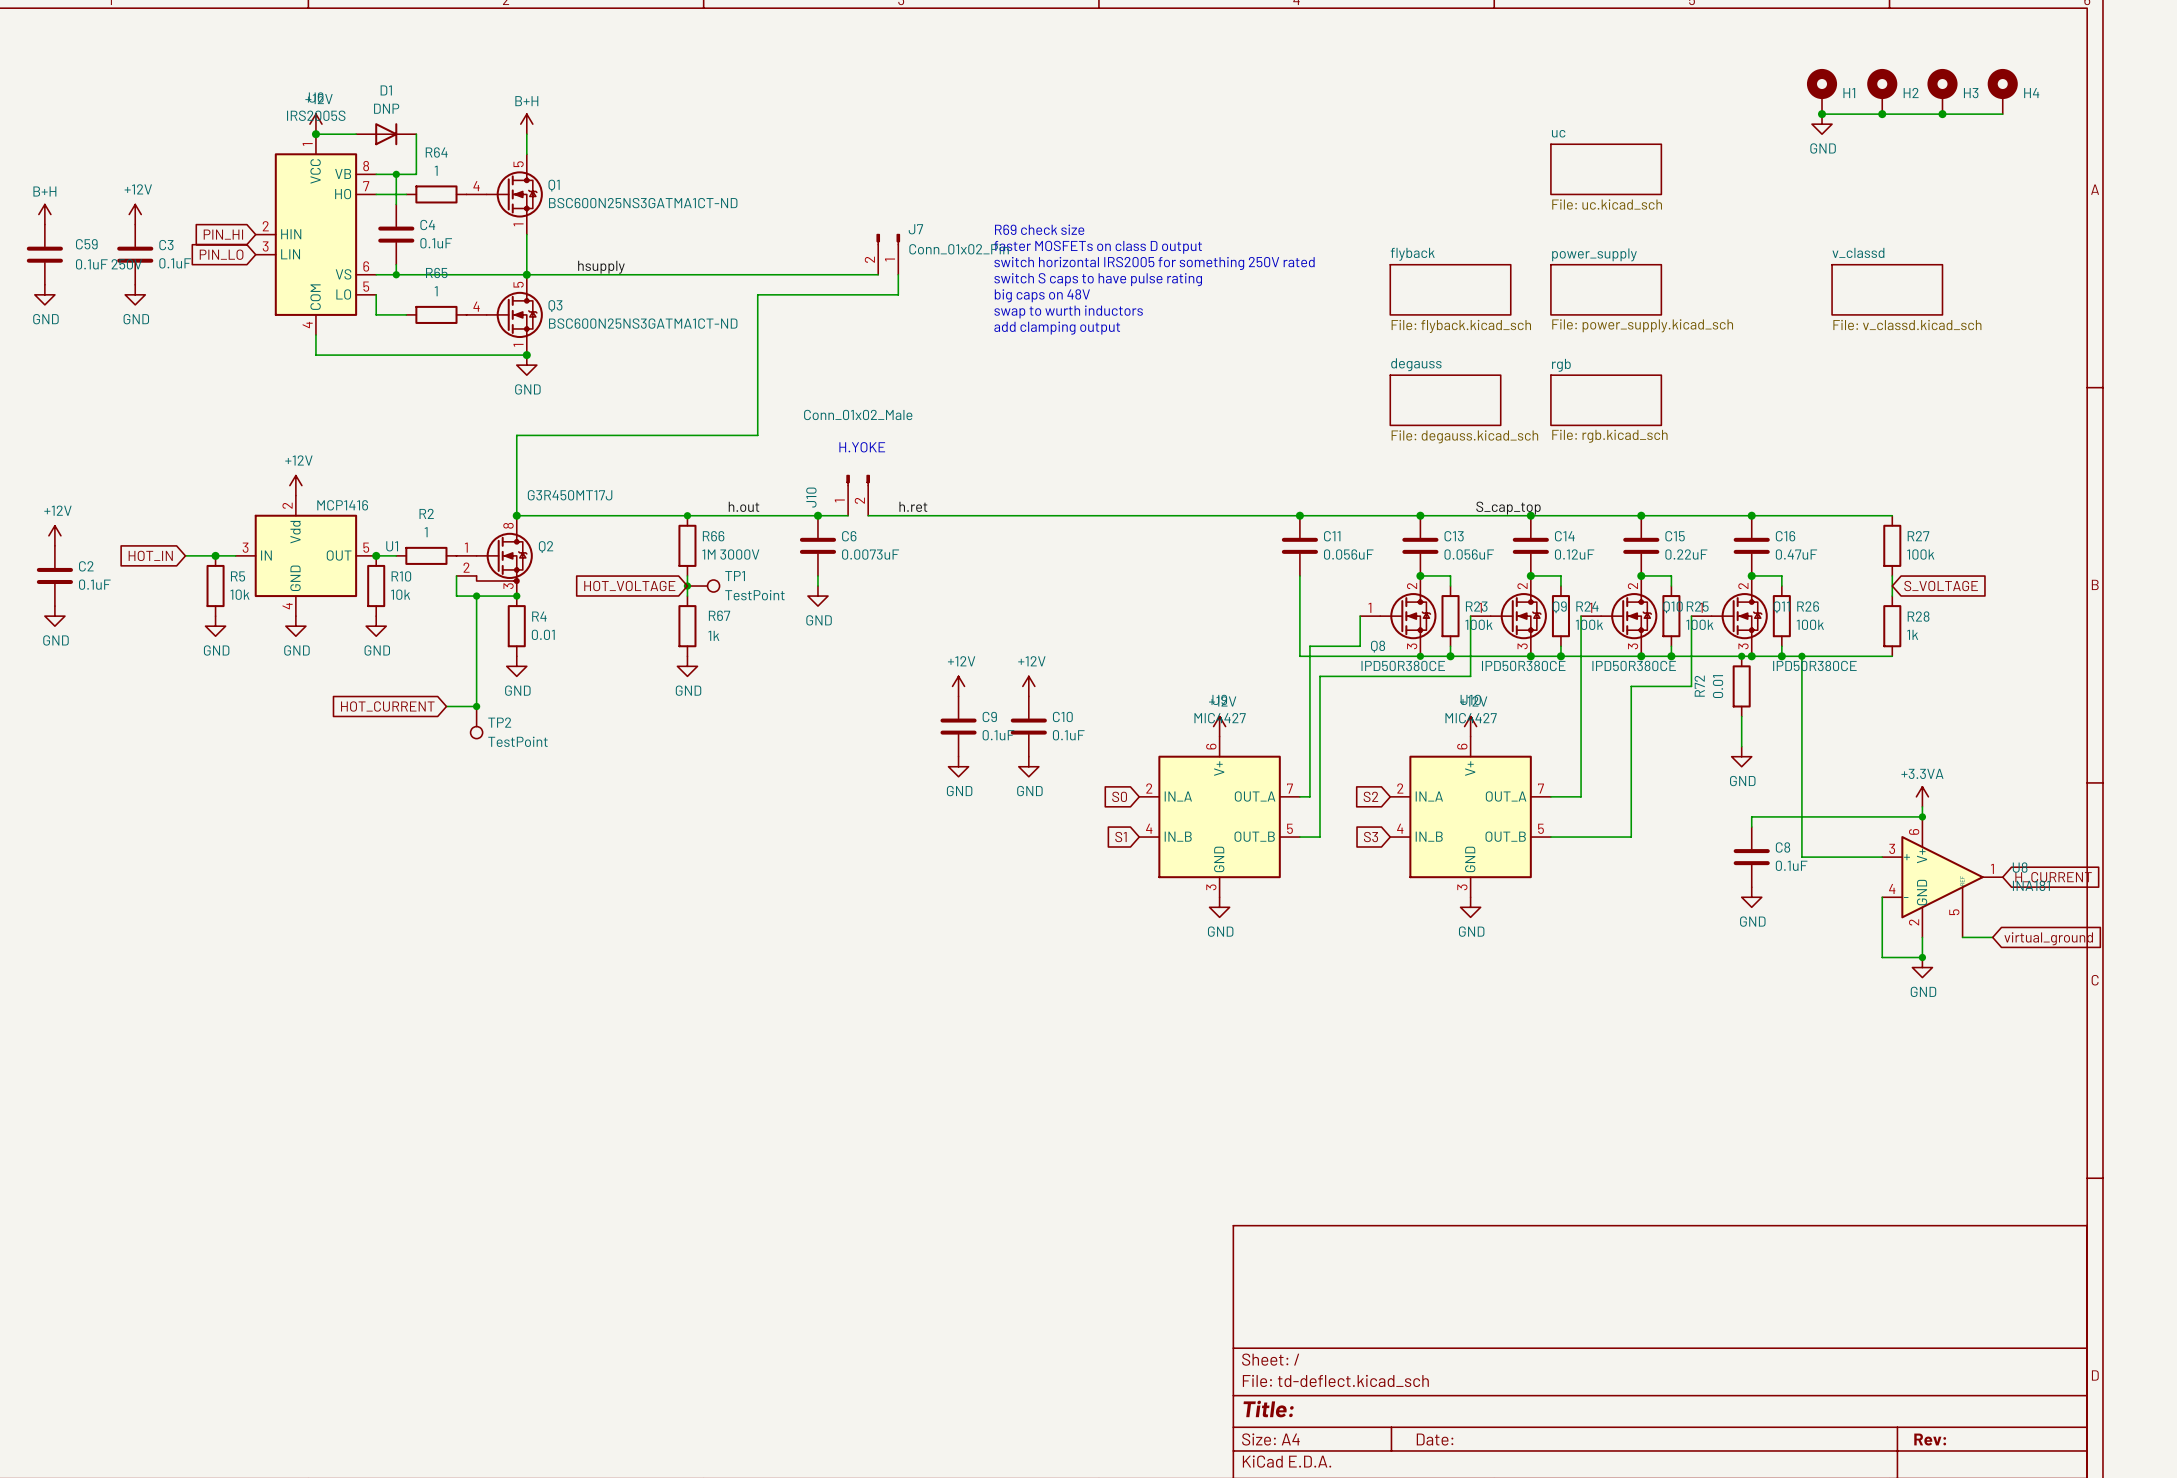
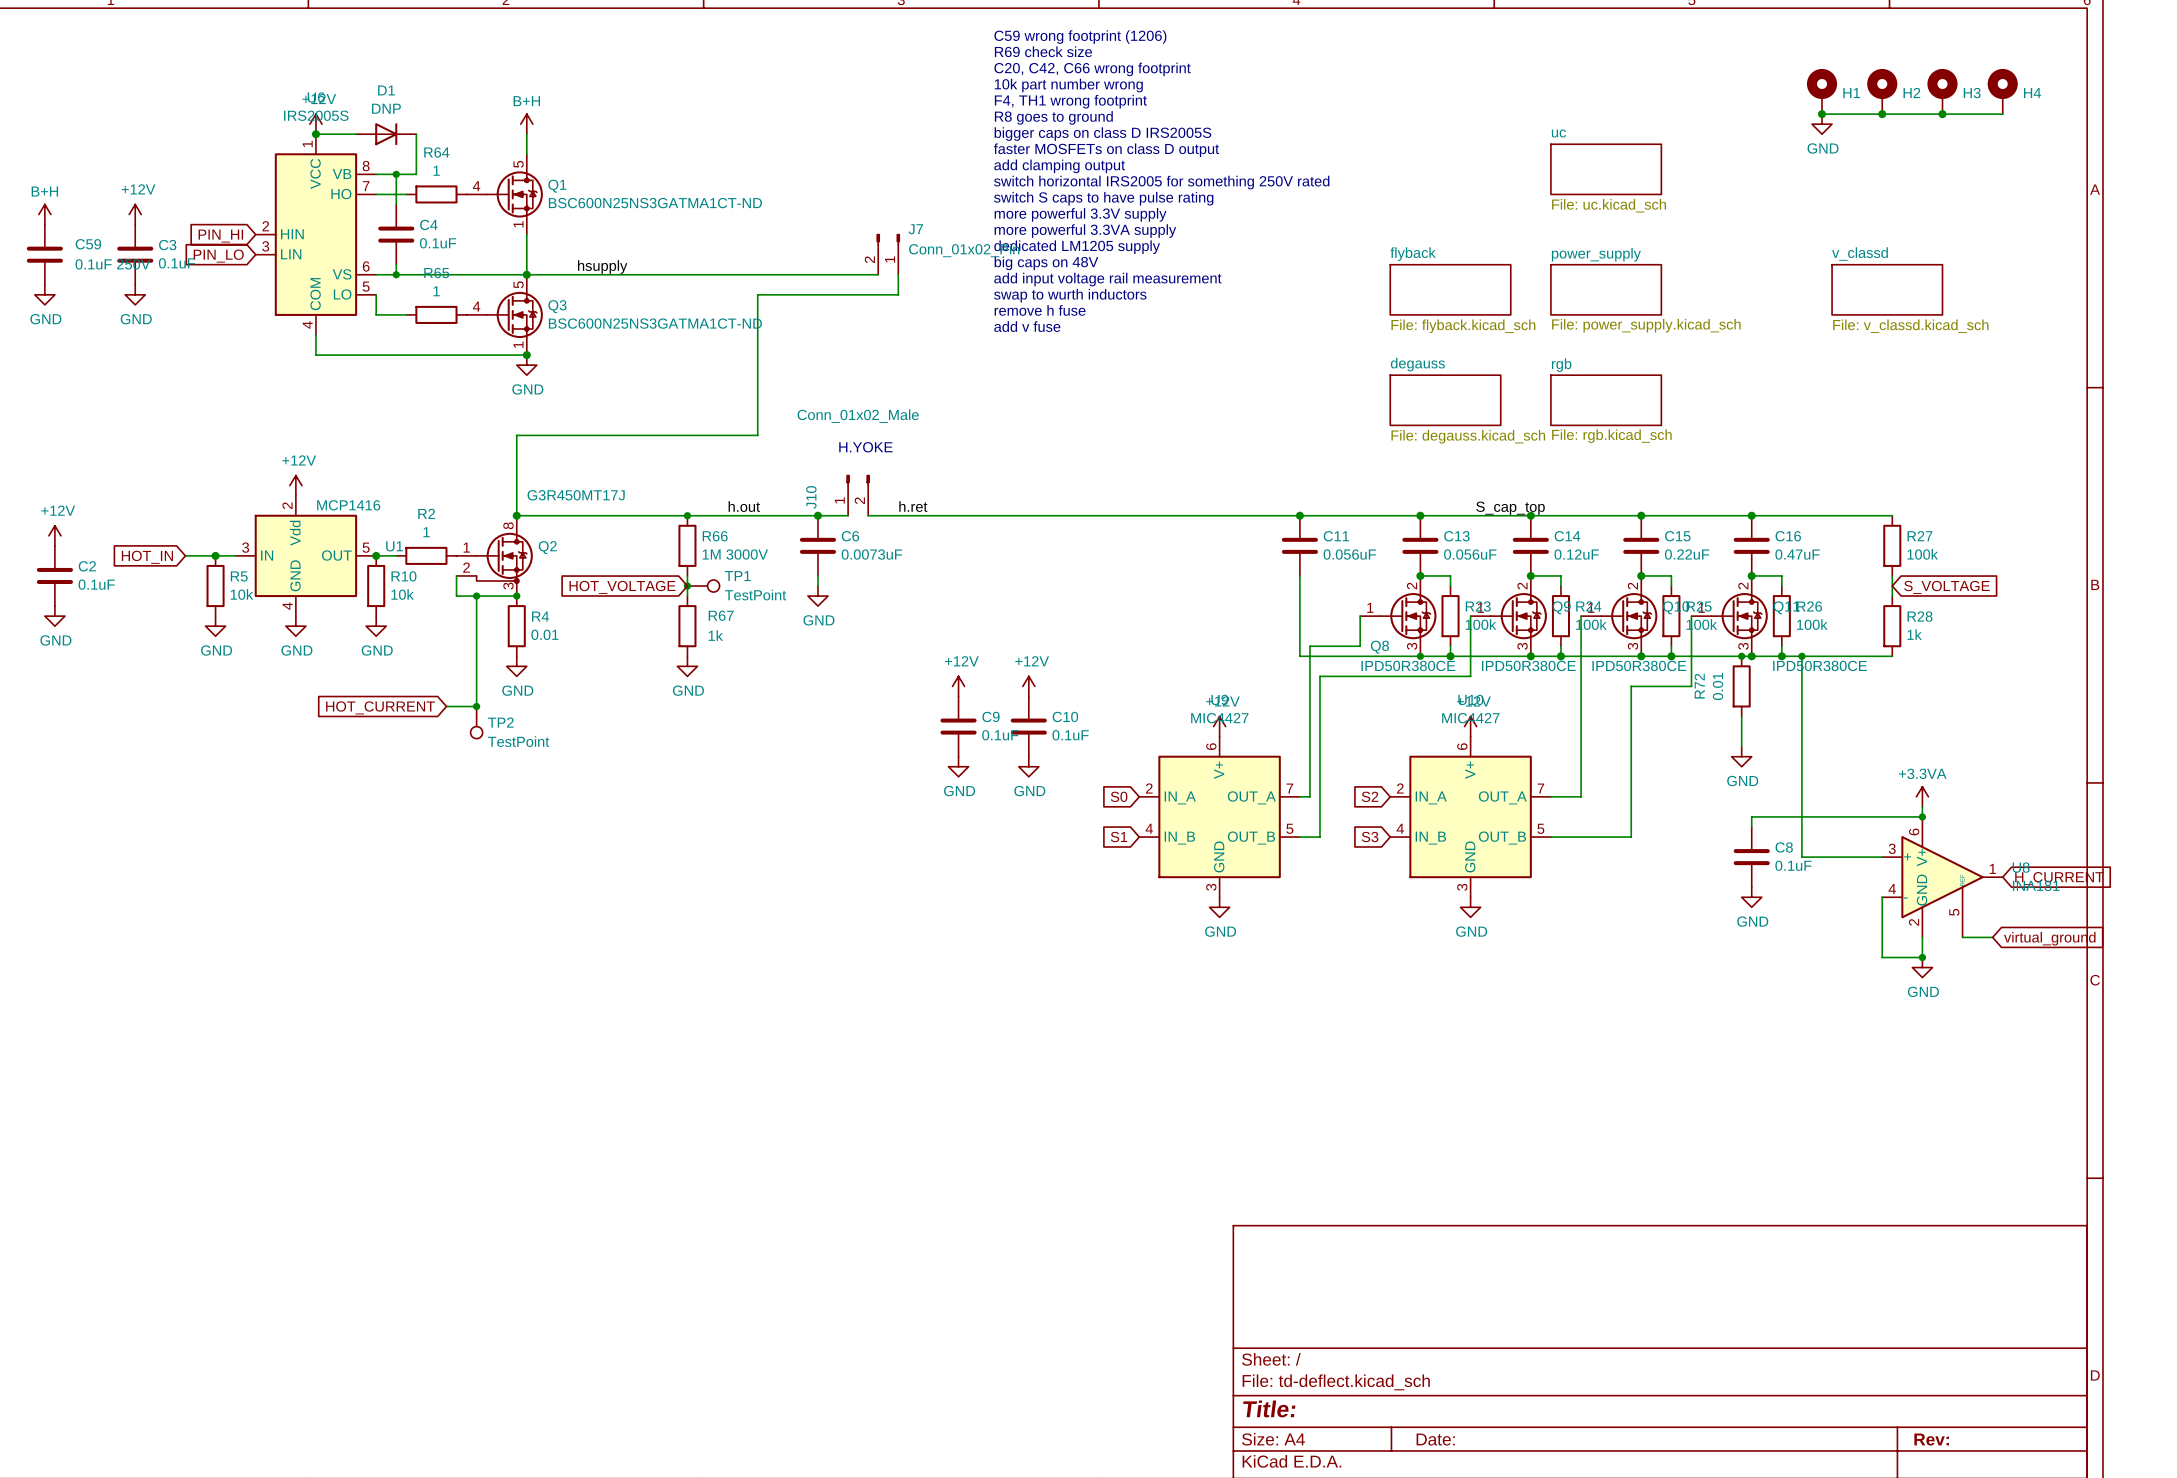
text: none -> C59 wrong footprint (1206) (1080, 37)
text: none -> R69 check size (1043, 51)
text: none -> C20, C42, C66 wrong footprint (1092, 69)
text: none -> 10k part number wrong (1068, 85)
text: none -> F4, TH1 wrong footprint (1070, 101)
text: none -> R8 goes to ground (1053, 117)
text: none -> bigger caps on class D IRS2005S (1102, 134)
text: none -> faster MOSFETs on class D output (1106, 150)
text: none -> add clamping output (1059, 166)
text: none -> switch horizontal IRS2005 for something 250V rated (1161, 182)
text: none -> switch S caps to have pulse rating (1103, 198)
text: none -> more powerful 3.3V supply (1080, 214)
text: R69 check size (1039, 229) -> more powerful 3.3VA supply (1085, 231)
text: faster MOSFETs on class D output (1098, 247) -> dedicated LM1205 supply (1077, 247)
text: switch horizontal IRS2005 for something 250V rated (1154, 263) -> big caps on 48V (1046, 263)
text: switch S caps to have pulse rating (1098, 279) -> add input voltage rail measurement (1107, 279)
text: big caps on 48V (1042, 295) -> swap to wurth inductors (1070, 295)
text: swap to wurth inductors (1068, 311) -> remove h fuse (1040, 310)
text: add clamping output (1057, 328) -> add v fuse (1027, 326)

